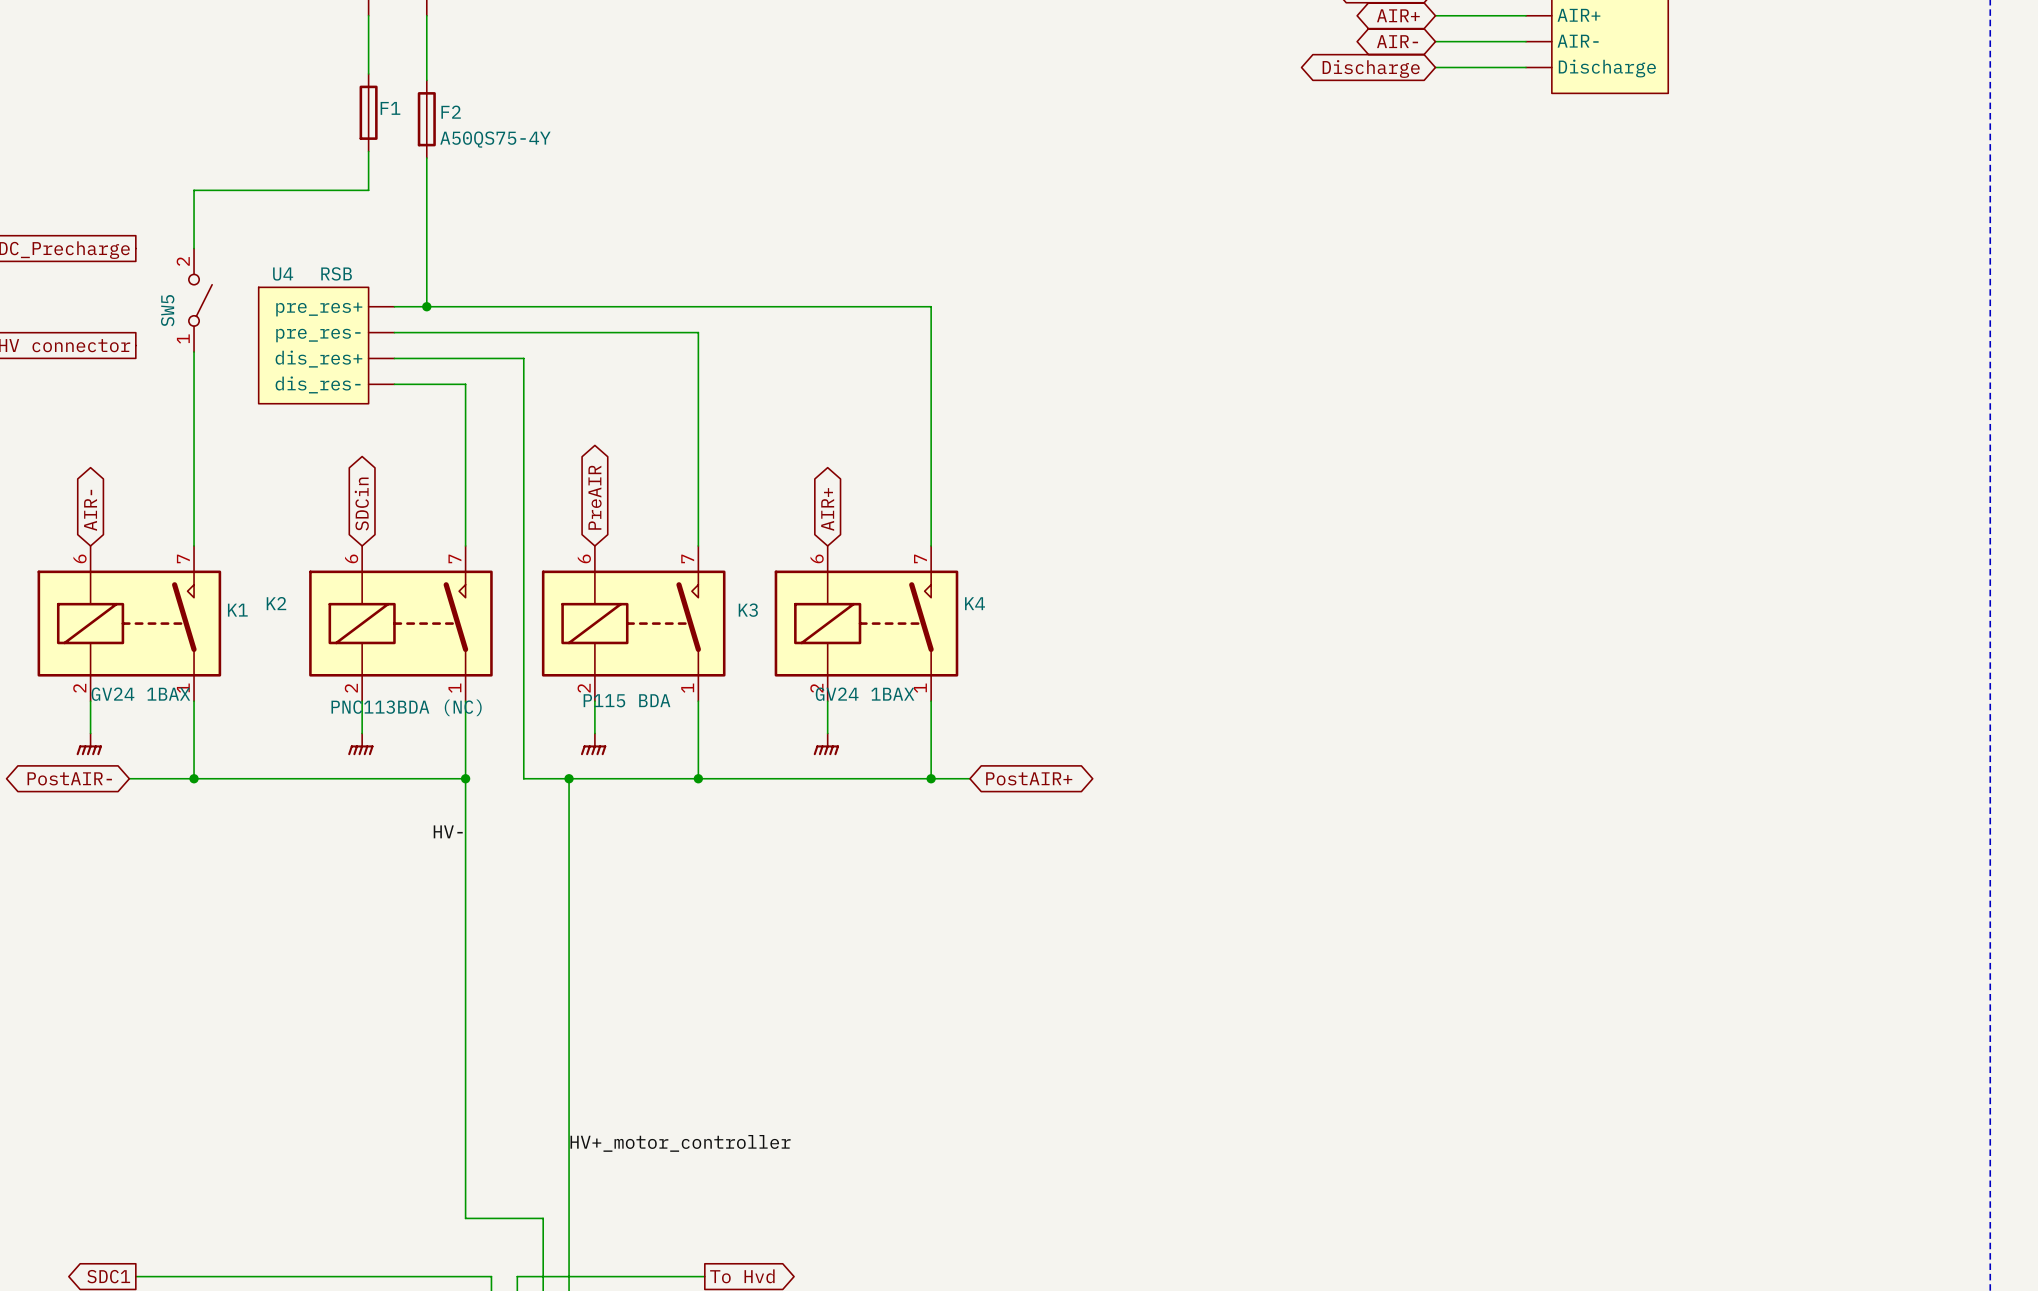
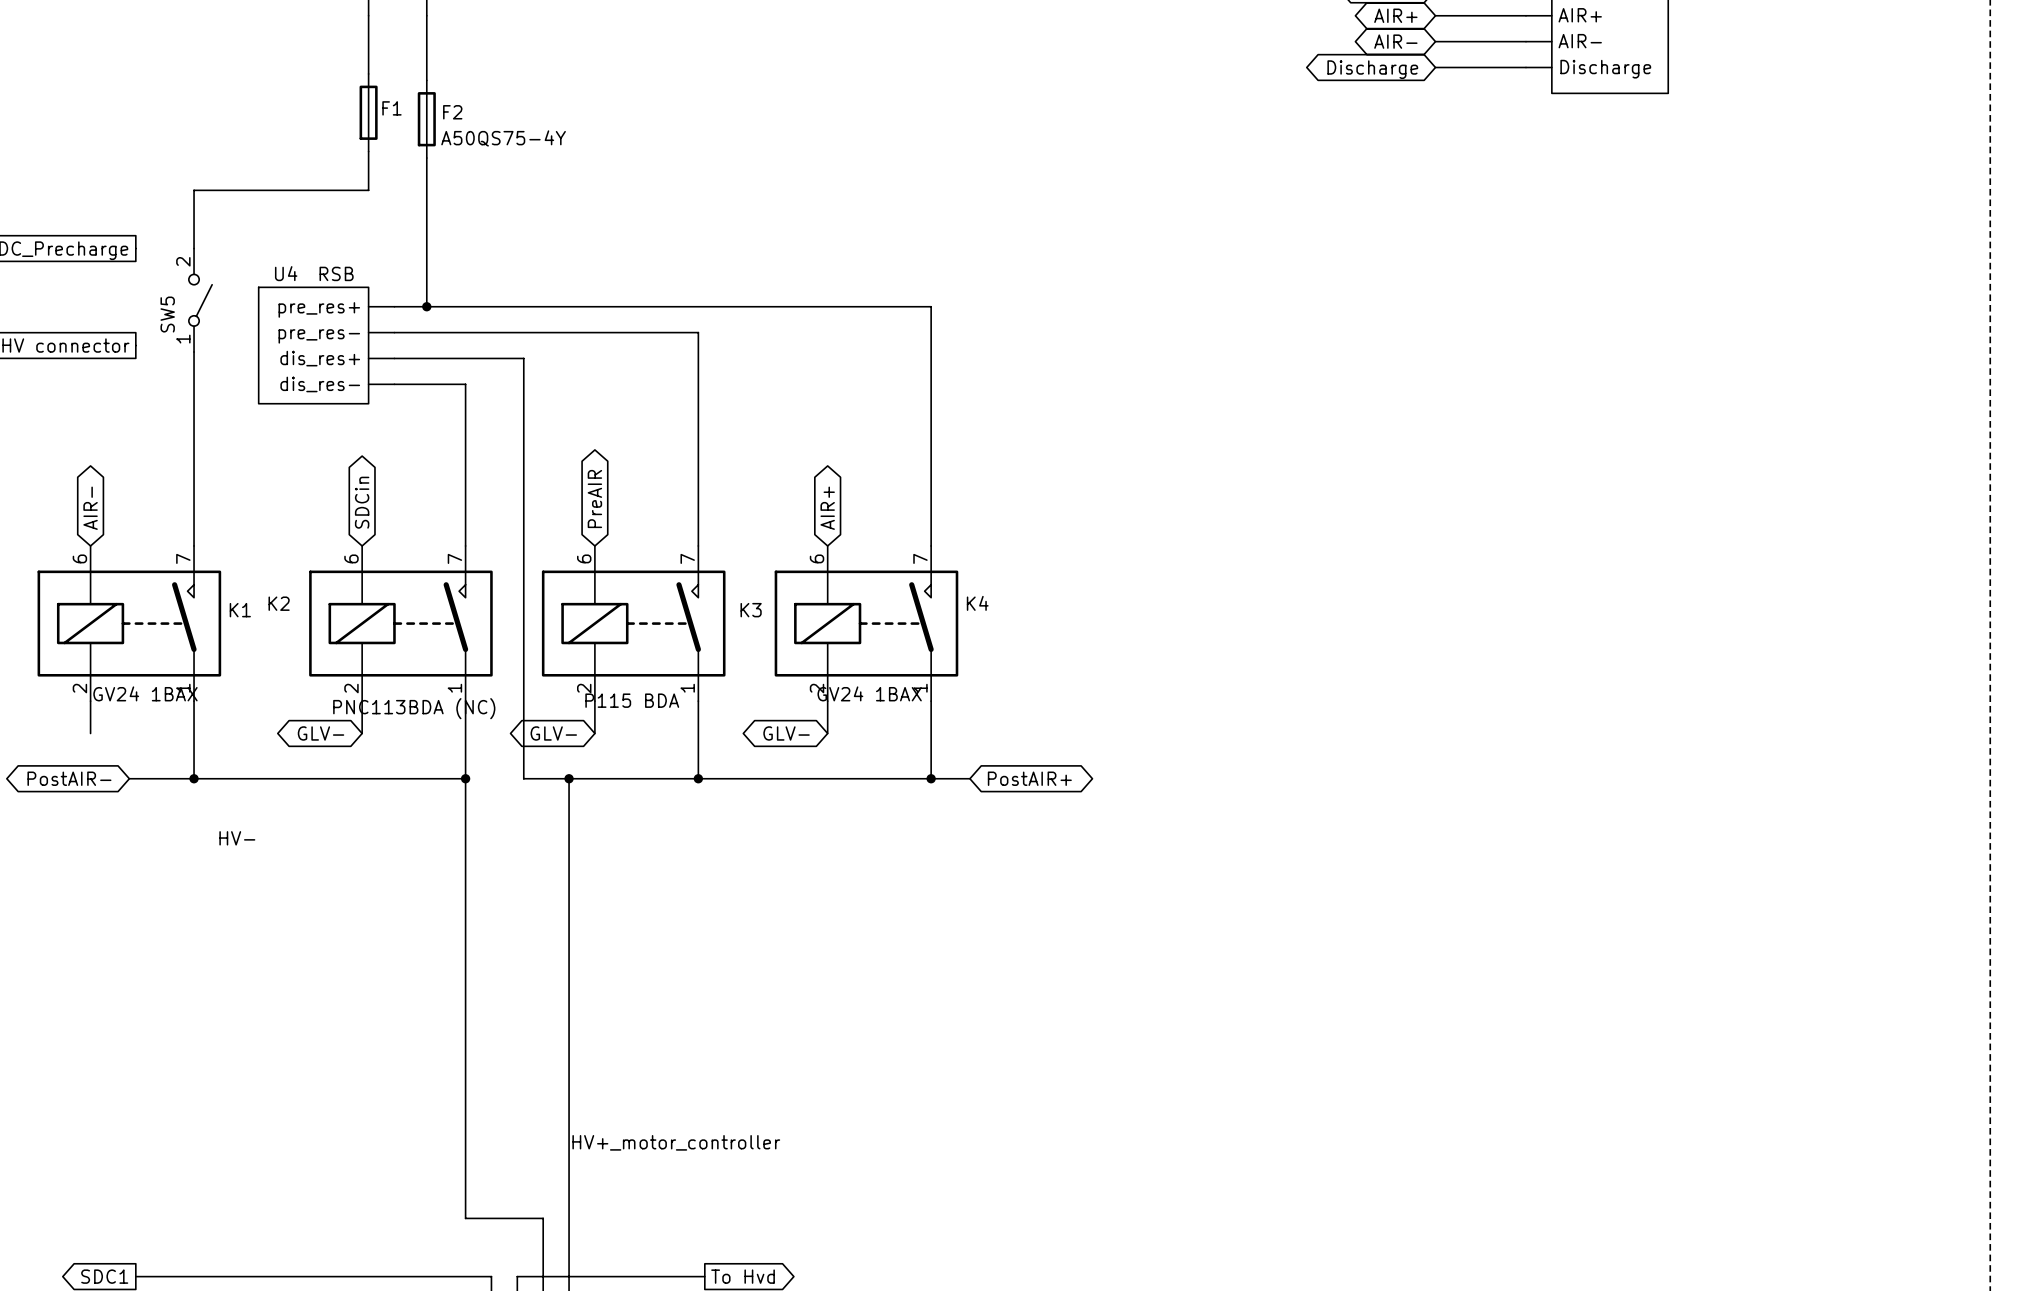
global label: none -> GLV- (321, 733)
global label: none -> GLV- (553, 733)
global label: none -> GLV- (786, 733)
power symbol: (89, 744) -> none
power symbol: (360, 744) -> none
power symbol: (593, 744) -> none
power symbol: (826, 744) -> none
label position: HV- (448, 831) -> HV- (237, 838)

